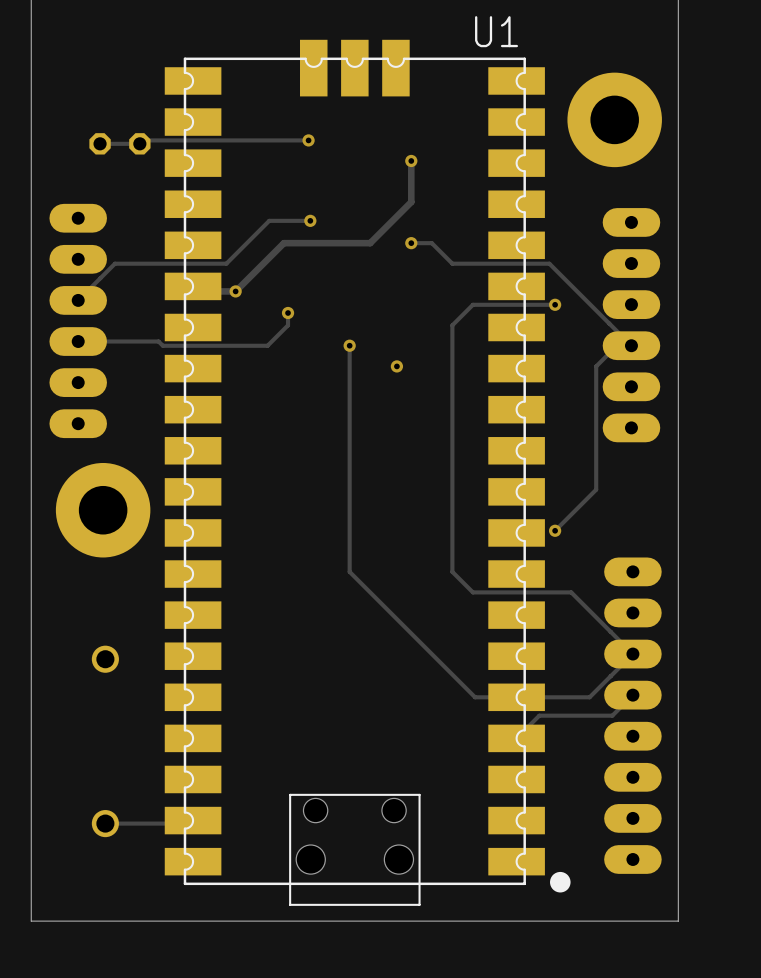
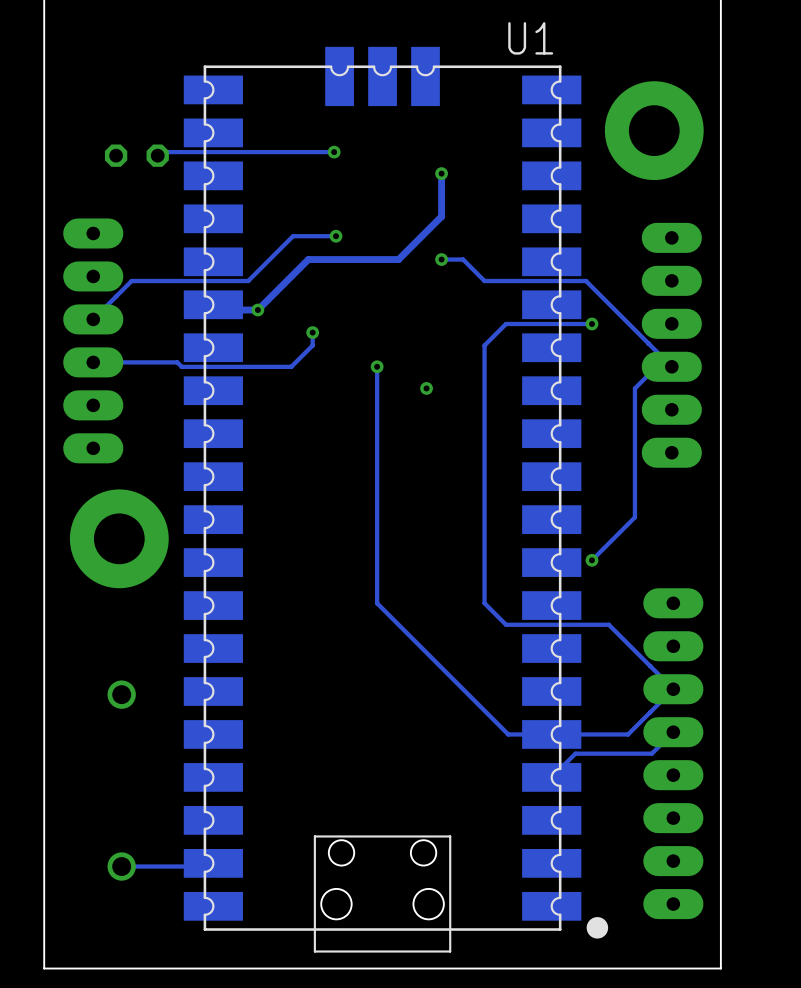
track: (139, 143) (100, 143) -> none

